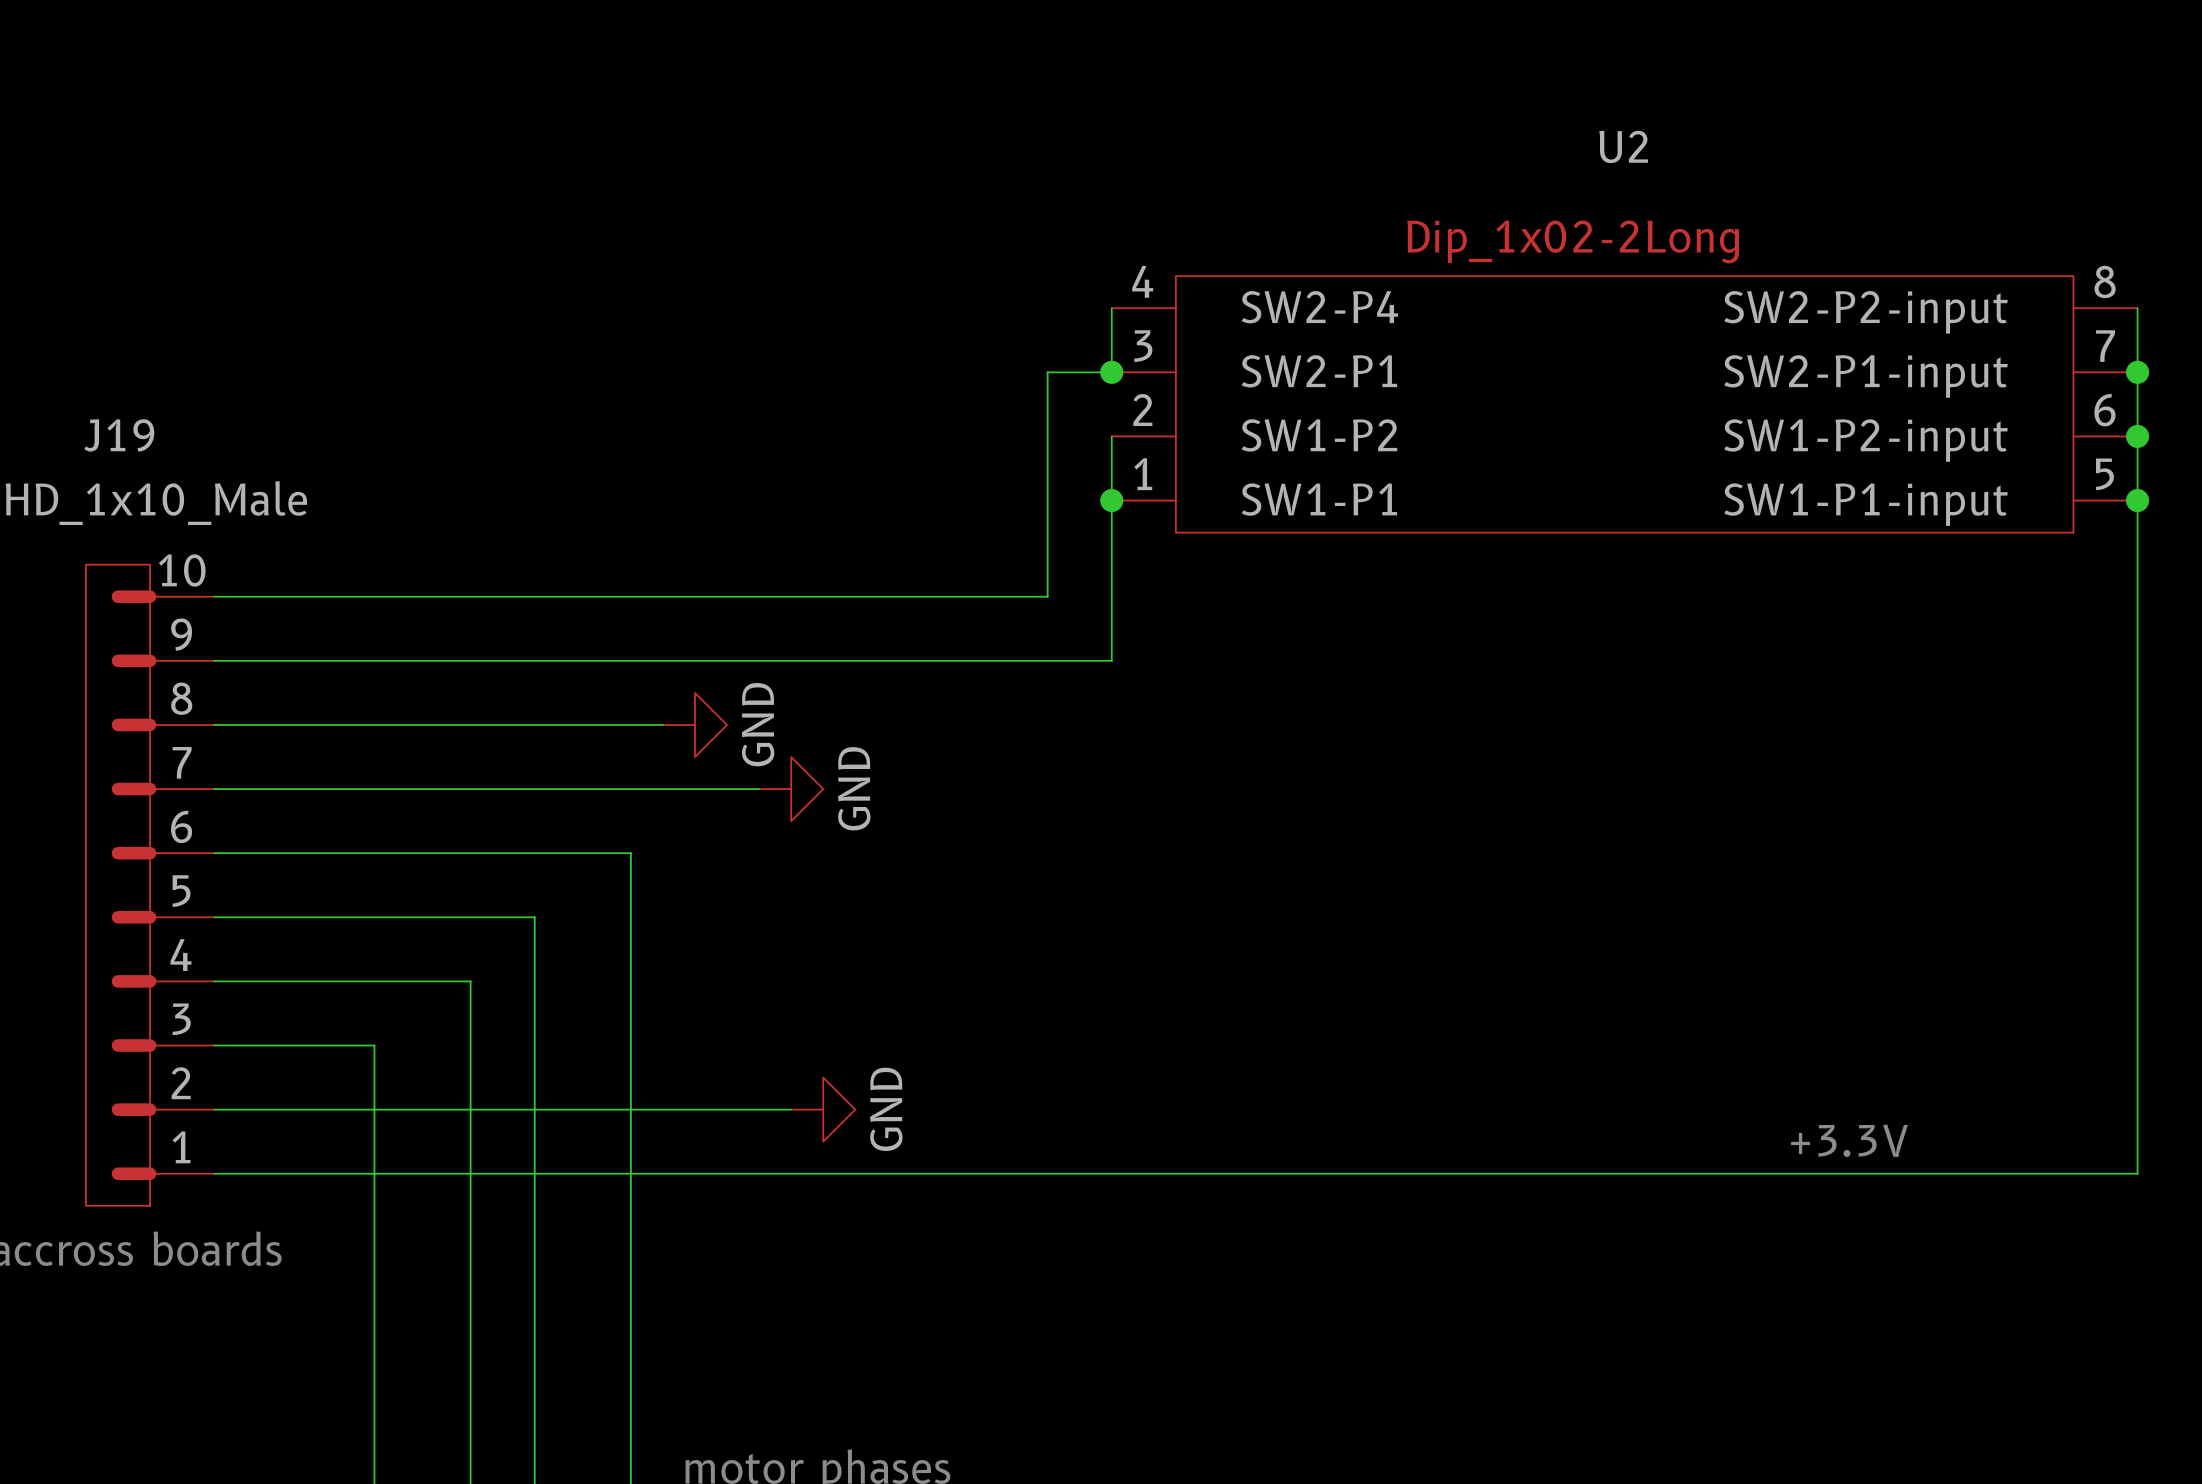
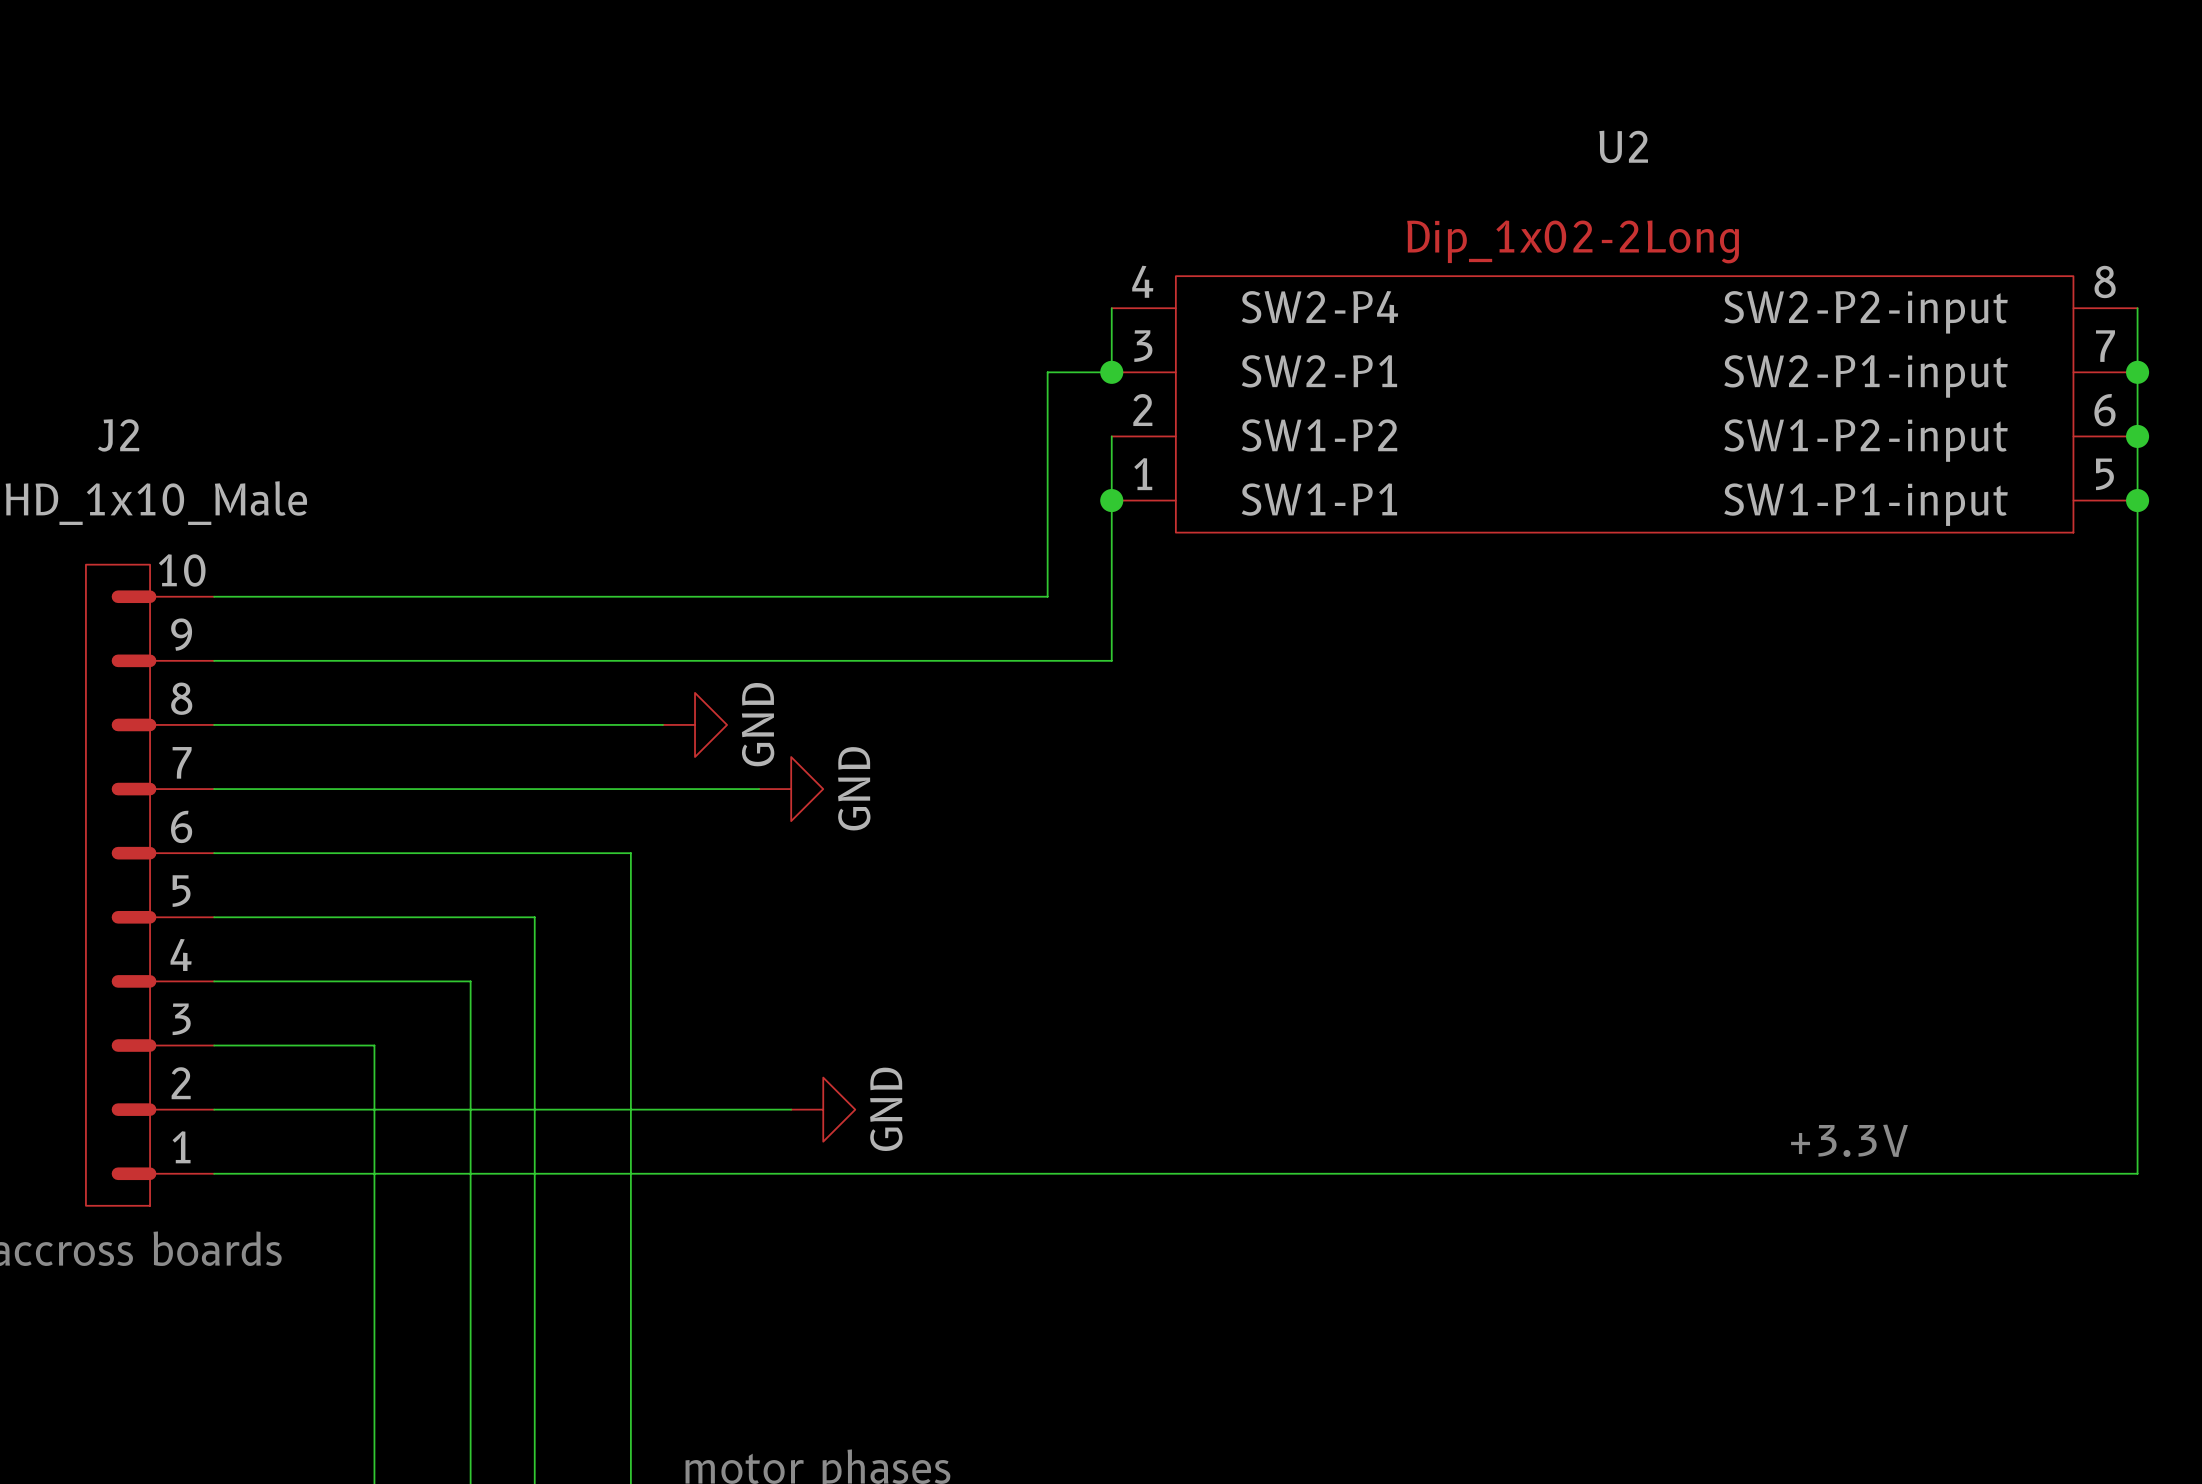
J19 name: J19 (119, 435) -> J2 (118, 435)

